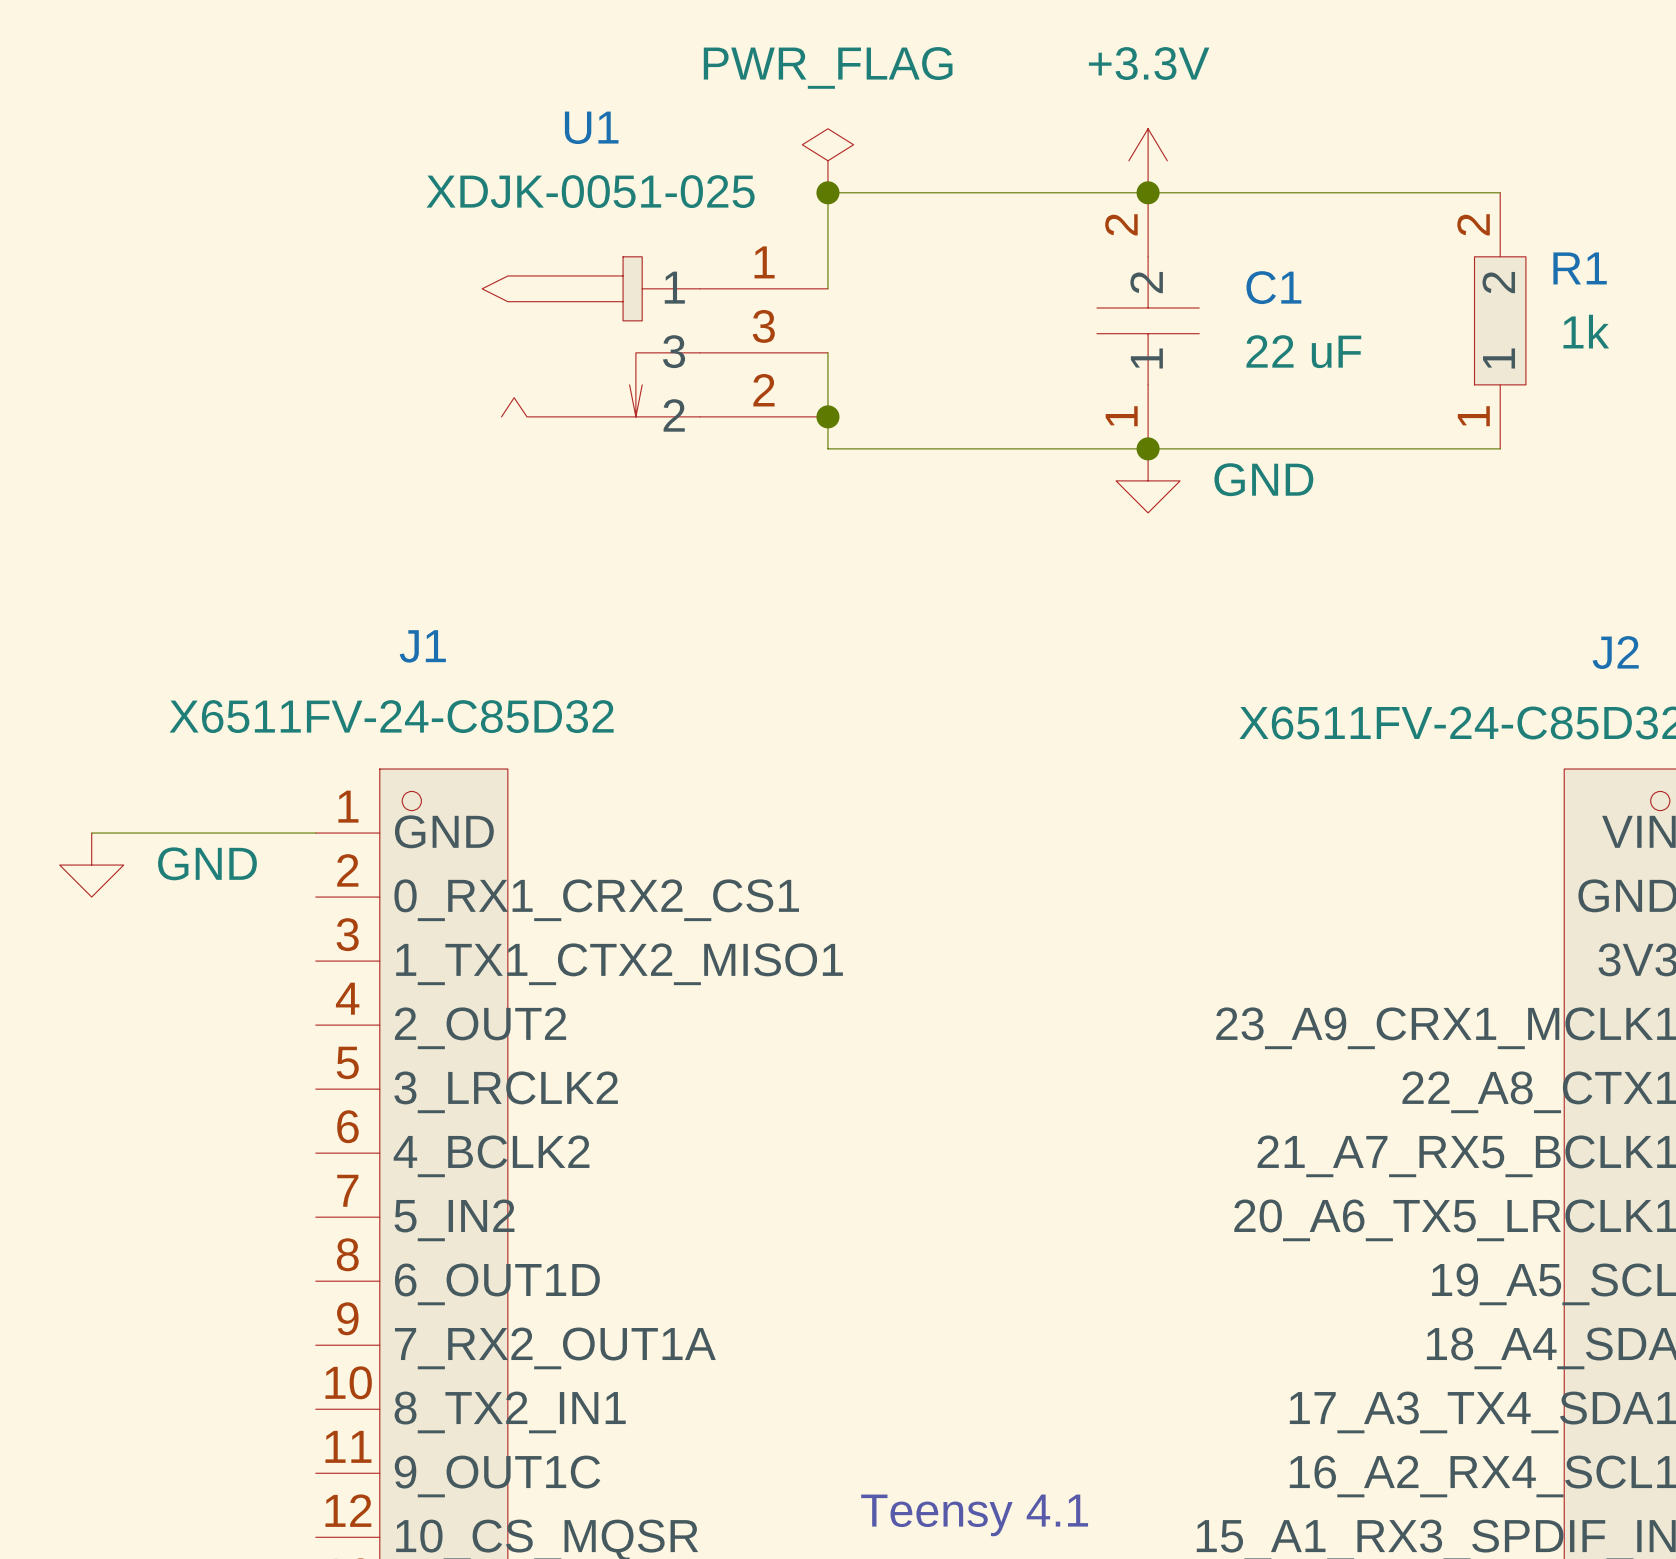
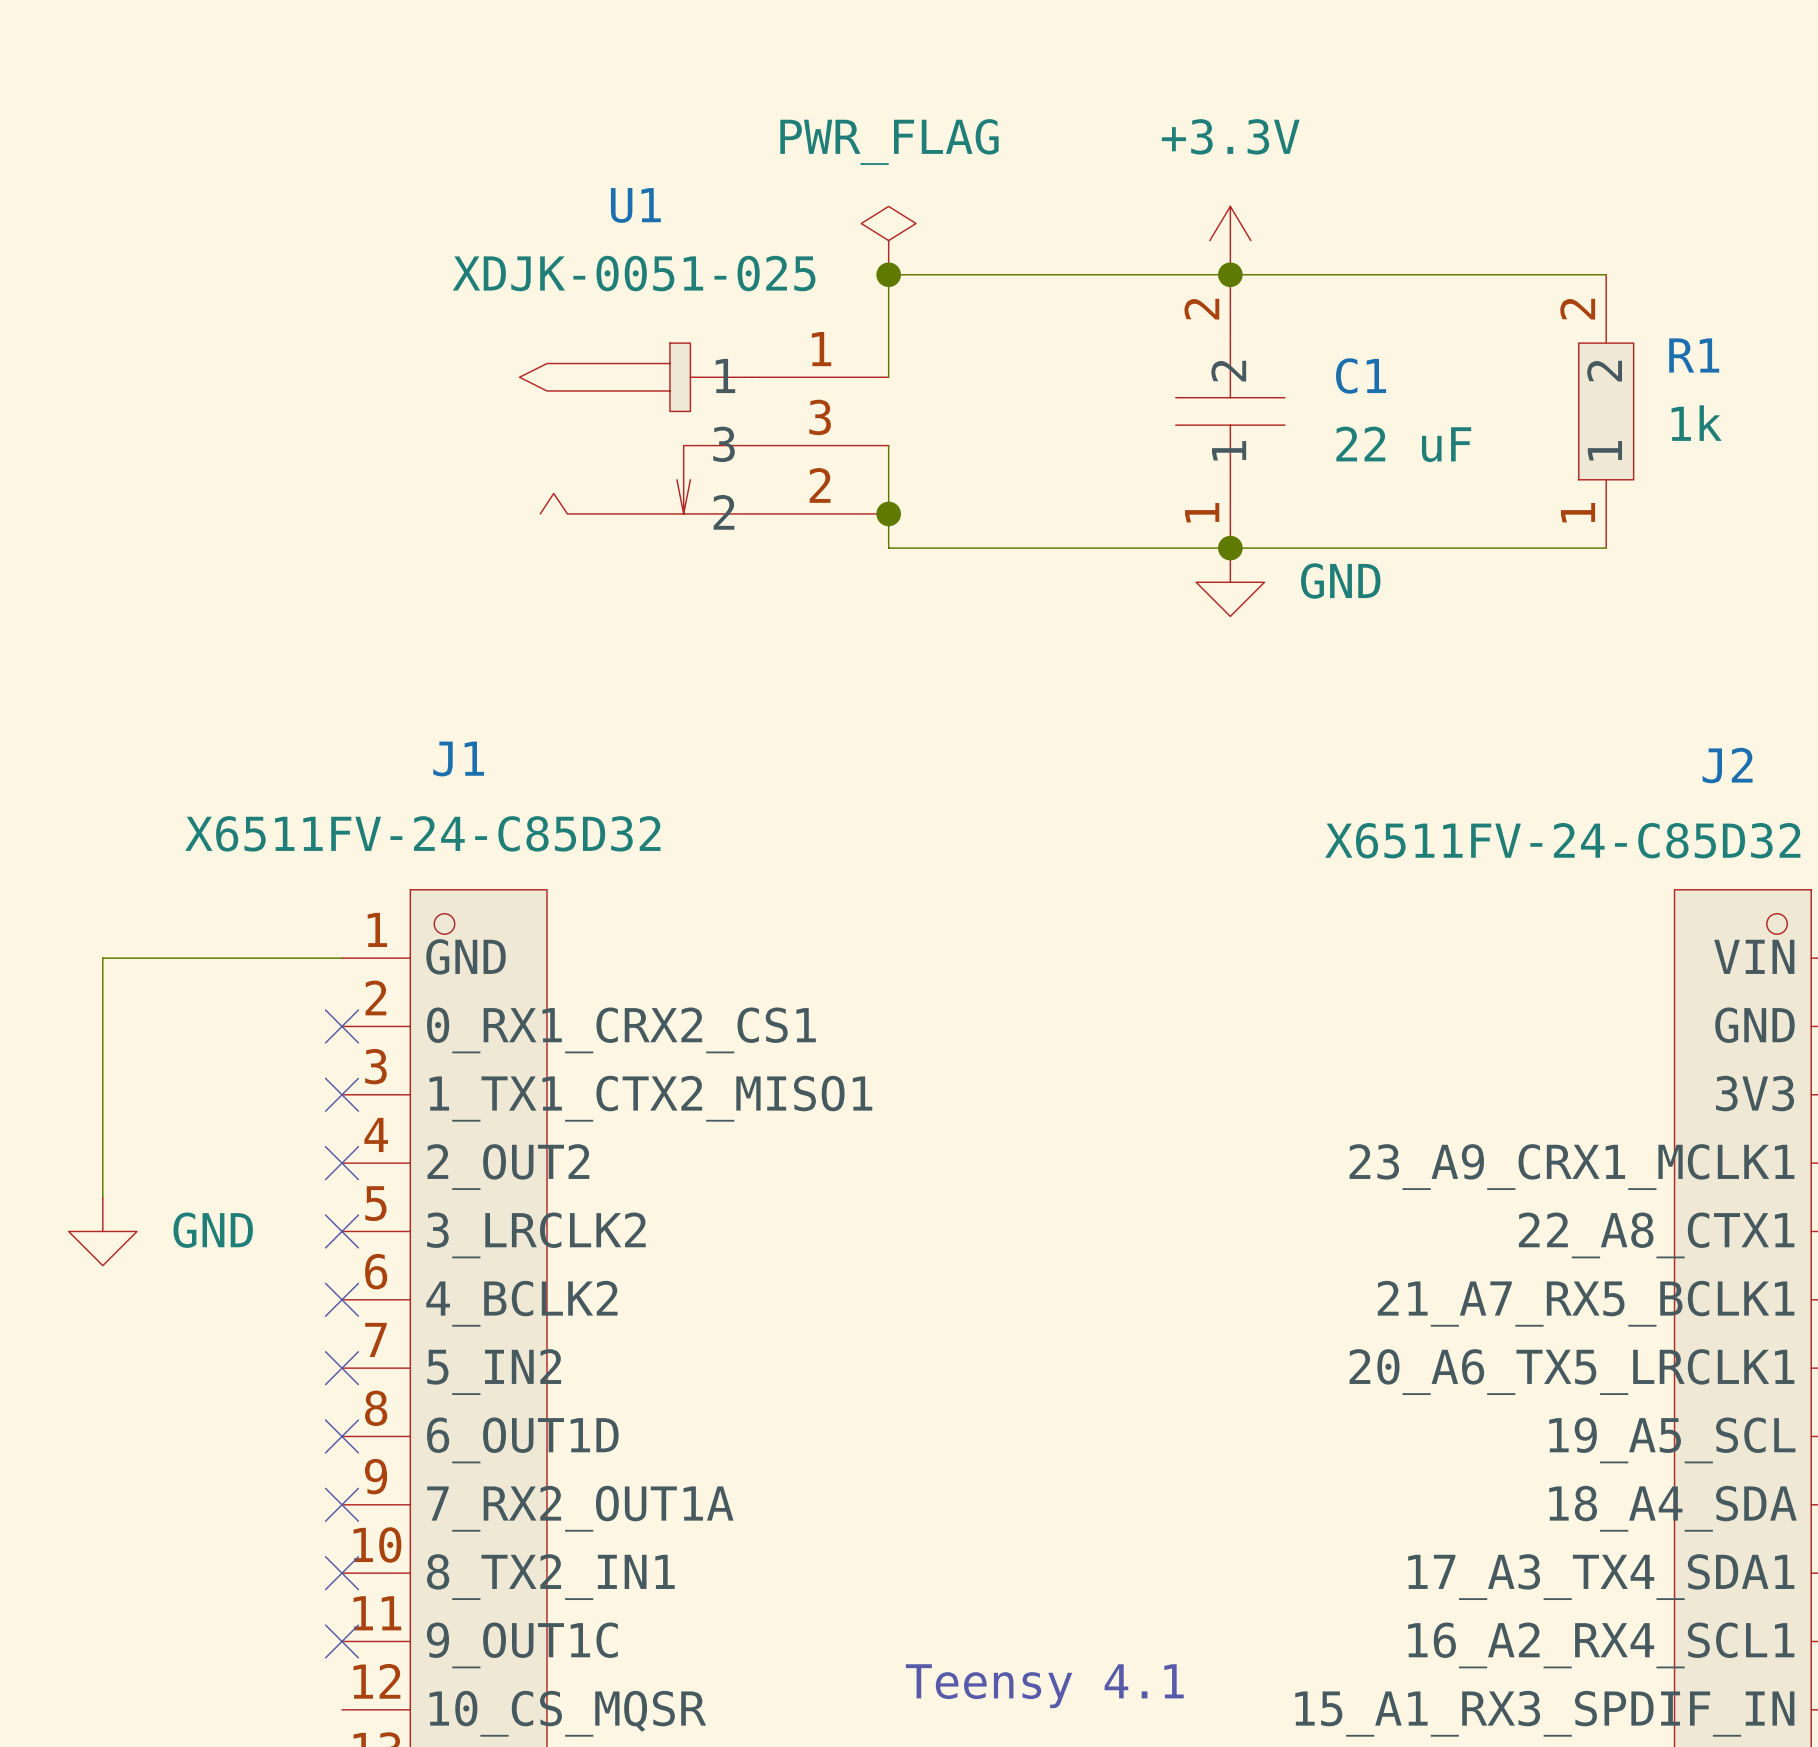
wire: none -> (102, 958) (102, 1197)
power symbol position: GND (91, 865) -> GND (102, 1231)
no-connect mark: none -> (341, 1026)
no-connect mark: none -> (341, 1094)
no-connect mark: none -> (341, 1163)
no-connect mark: none -> (341, 1231)
no-connect mark: none -> (341, 1299)
no-connect mark: none -> (341, 1368)
no-connect mark: none -> (341, 1436)
no-connect mark: none -> (341, 1504)
no-connect mark: none -> (341, 1573)
no-connect mark: none -> (341, 1641)

